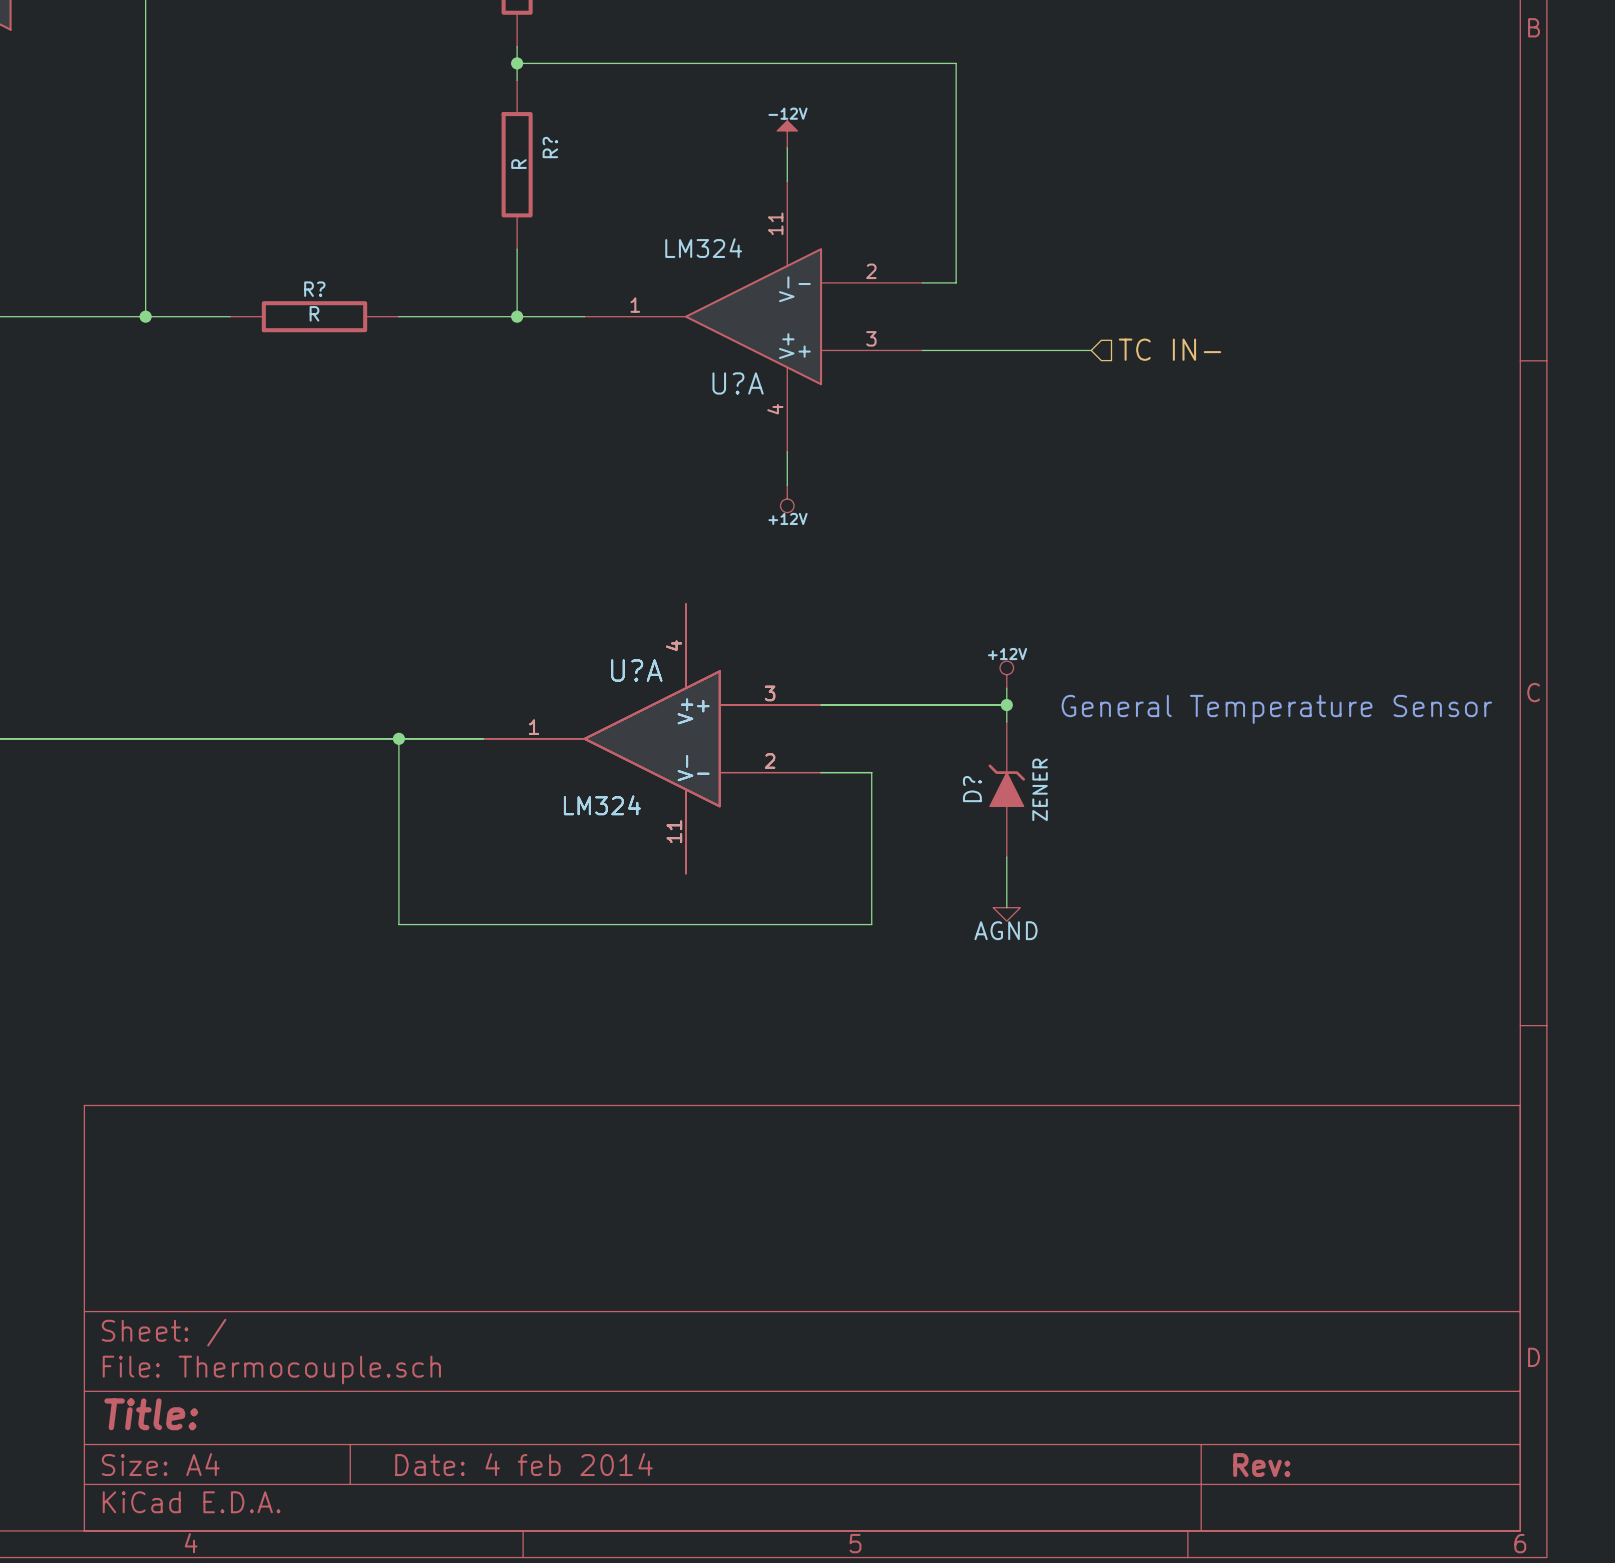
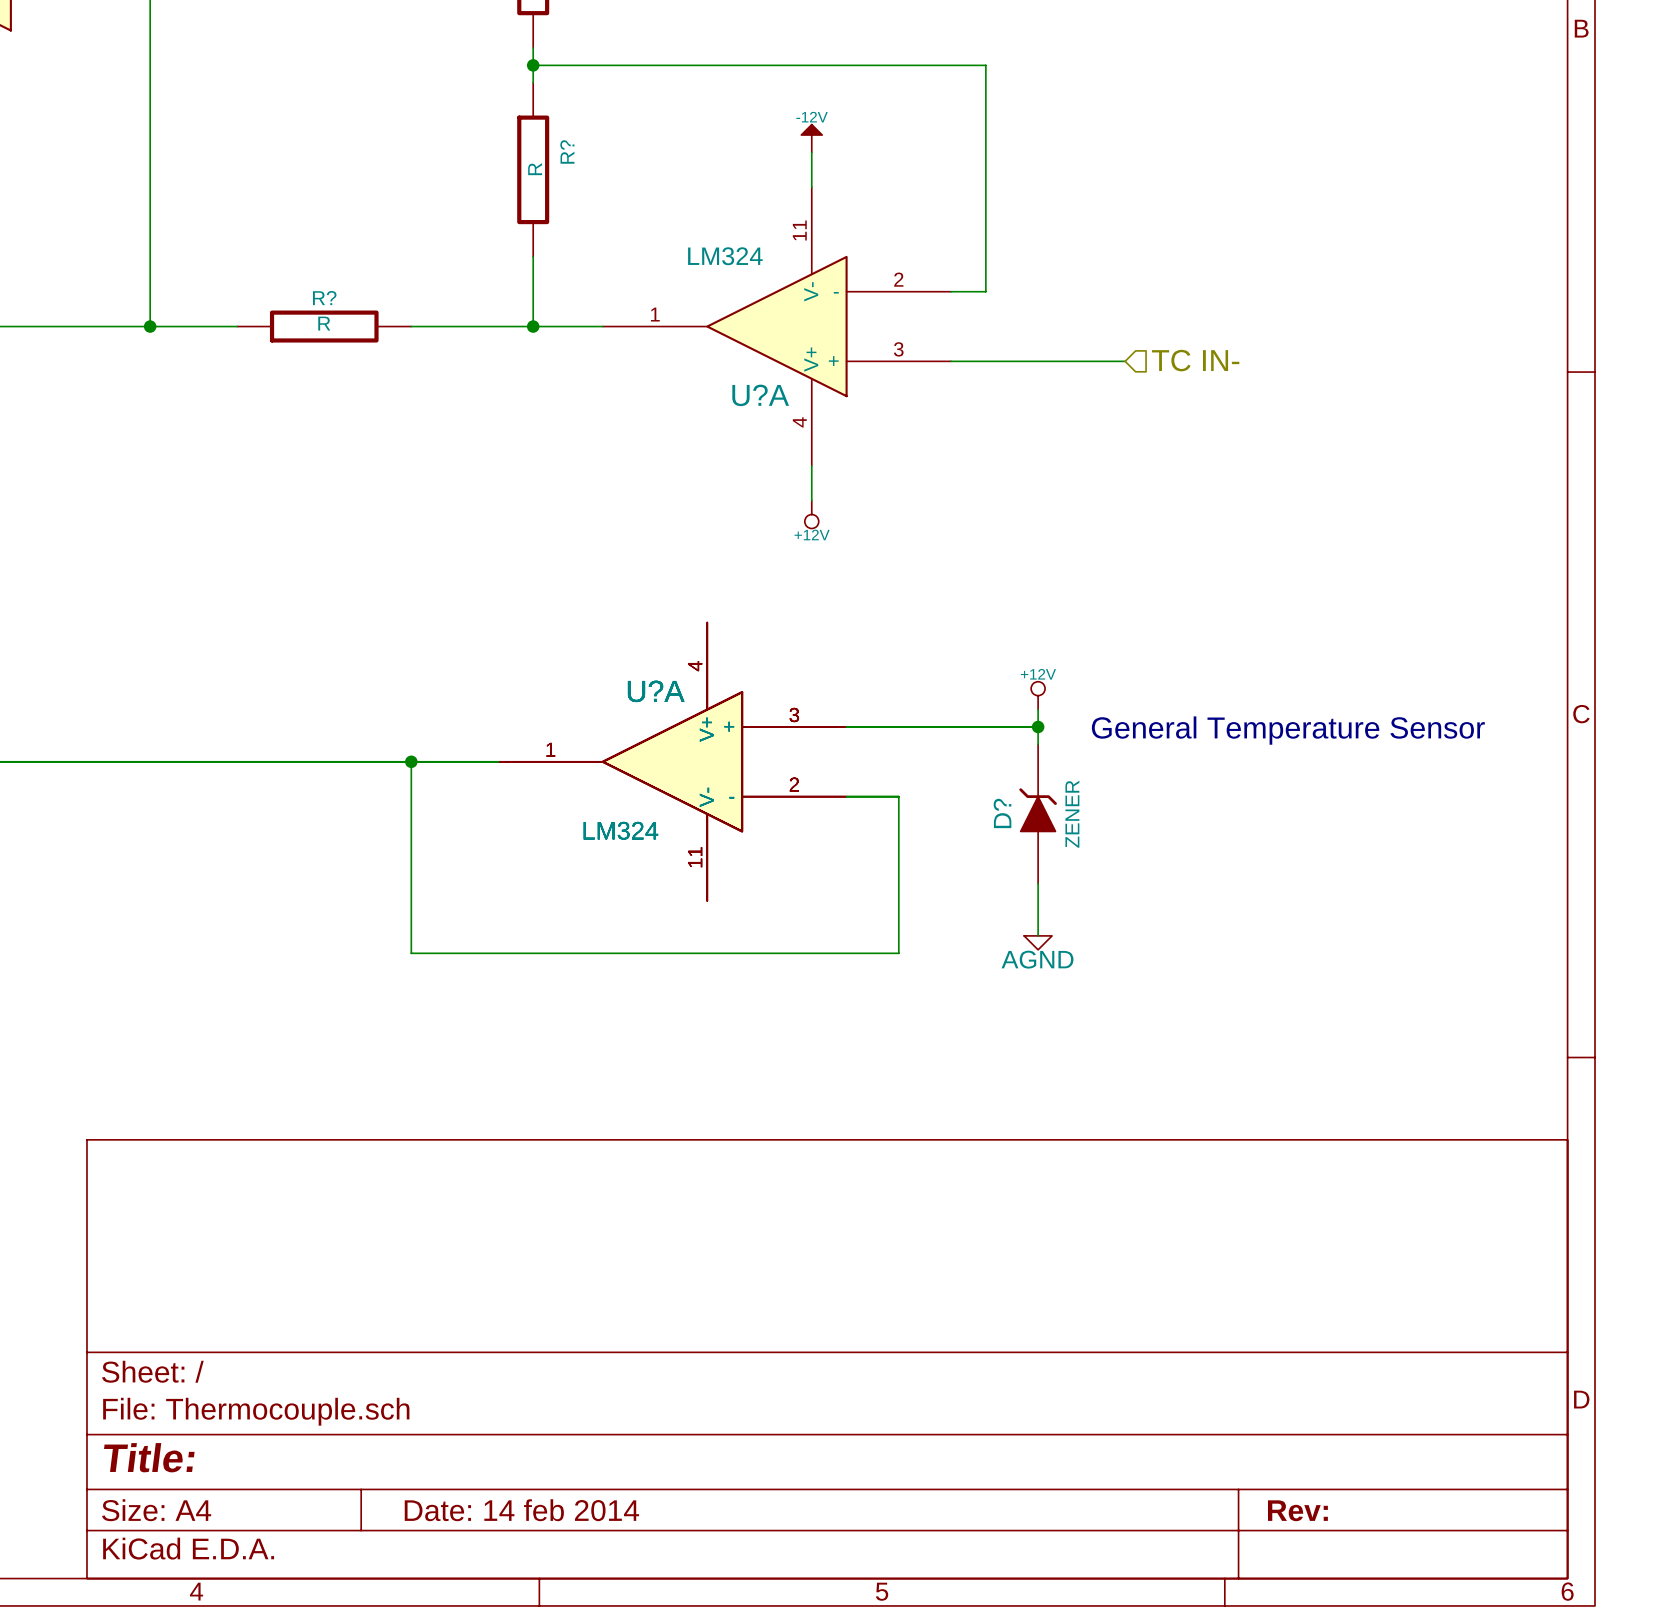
title block: Date: 4 feb 2014 (523, 1464) -> Date: 14 feb 2014 (521, 1510)

